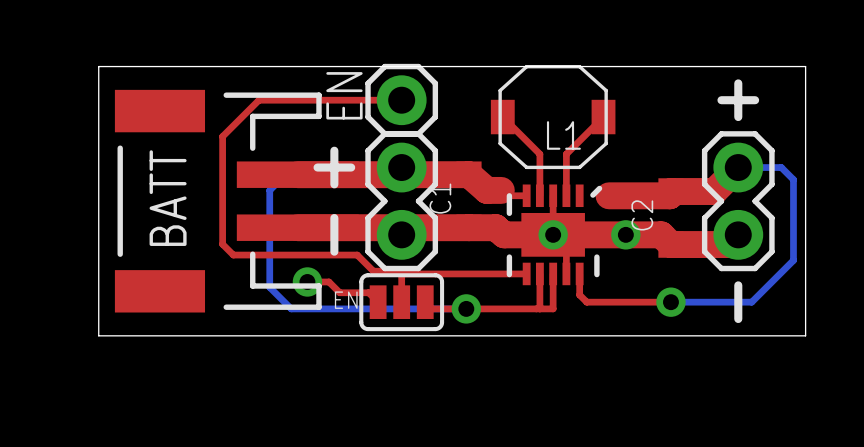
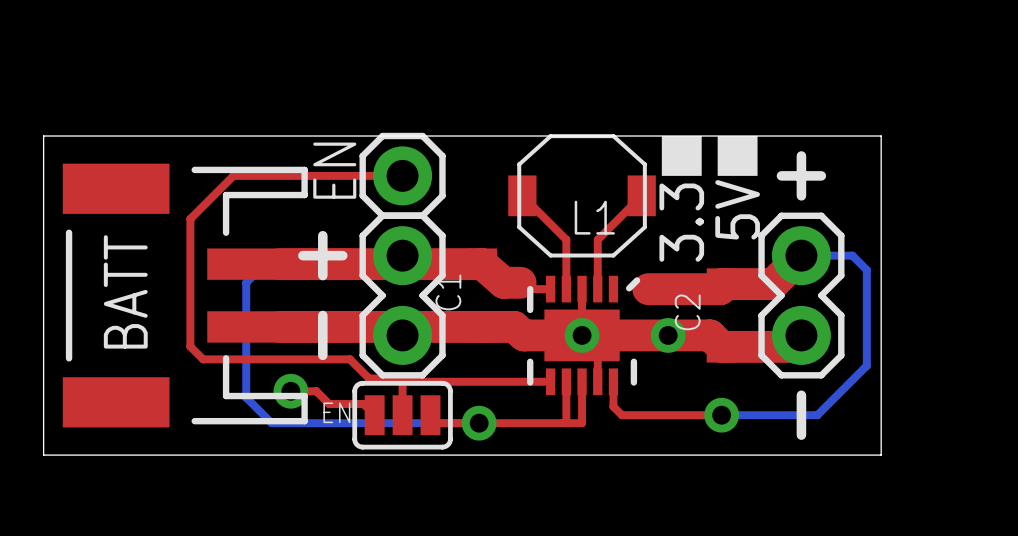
drawing: none -> [661, 136, 758, 176]
text: none -> 5V (737, 209)
text: none -> 3.3 (681, 222)

